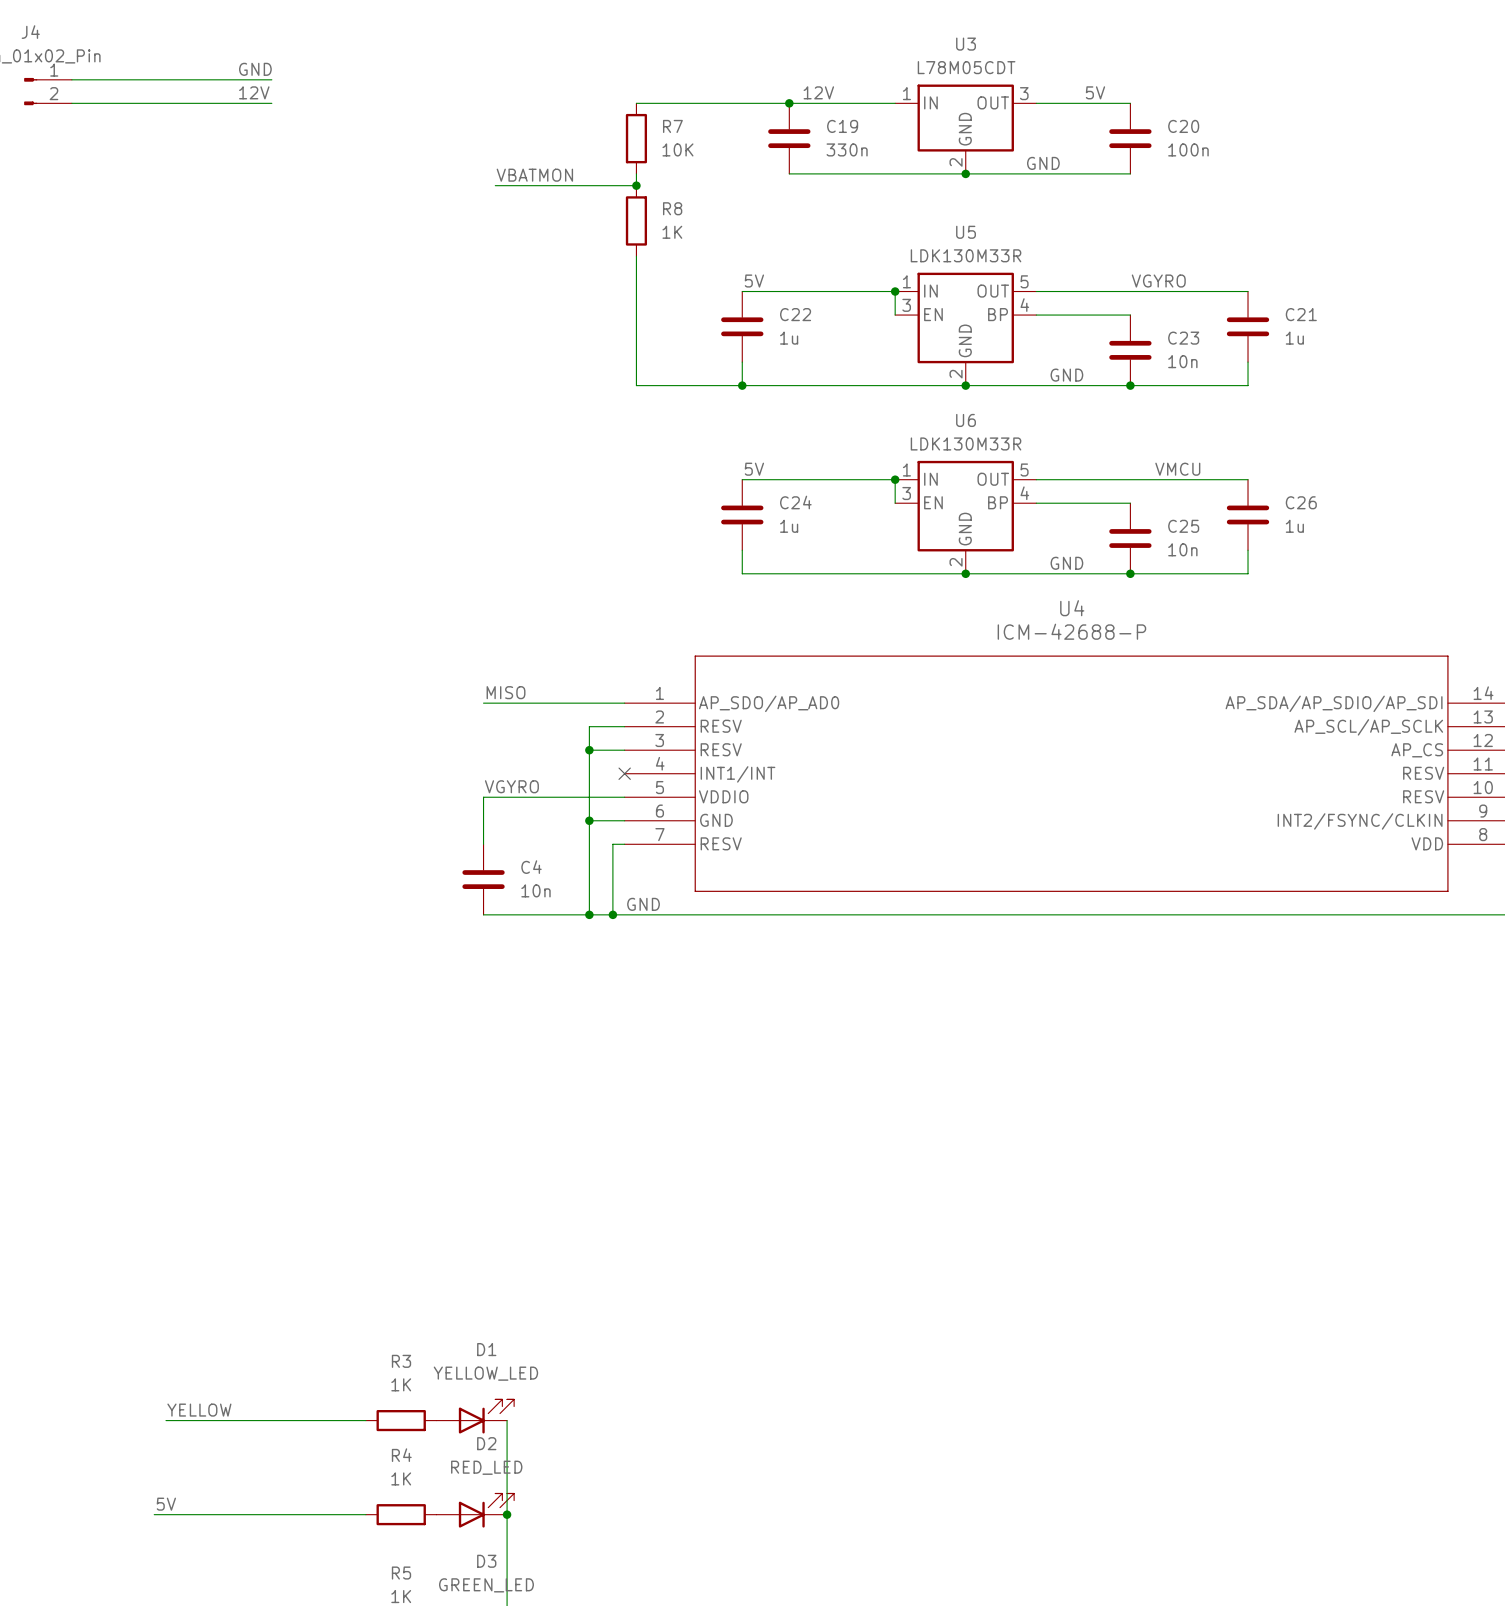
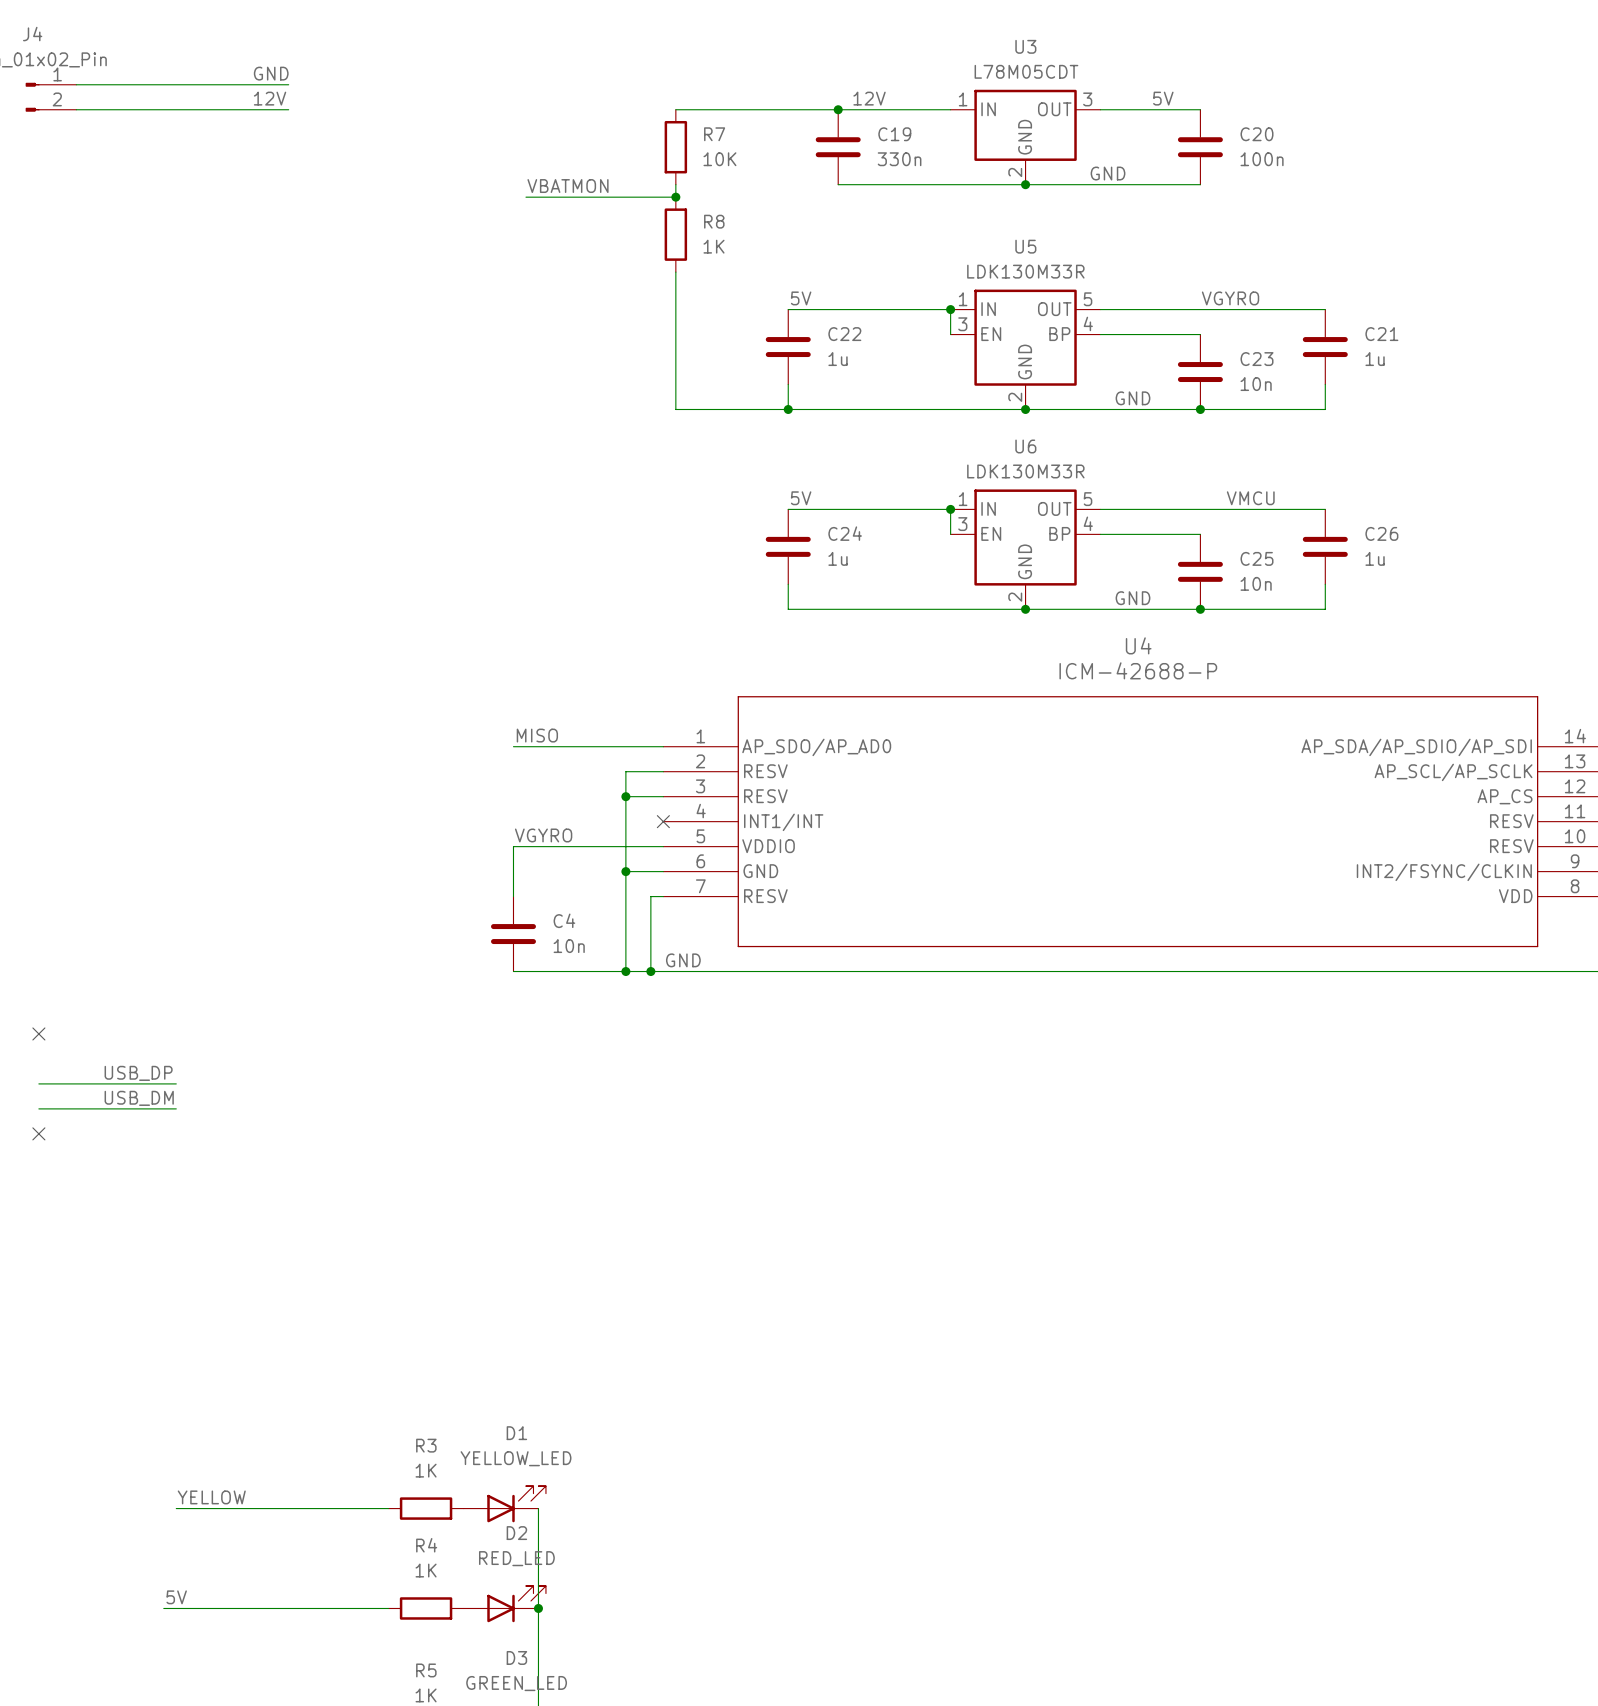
no-connect mark: none -> (38, 1033)
label: none -> USB_DP (138, 1073)
wire: none -> (38, 1083) (176, 1083)
label: none -> USB_DM (139, 1098)
wire: none -> (38, 1108) (176, 1108)
no-connect mark: none -> (38, 1133)

